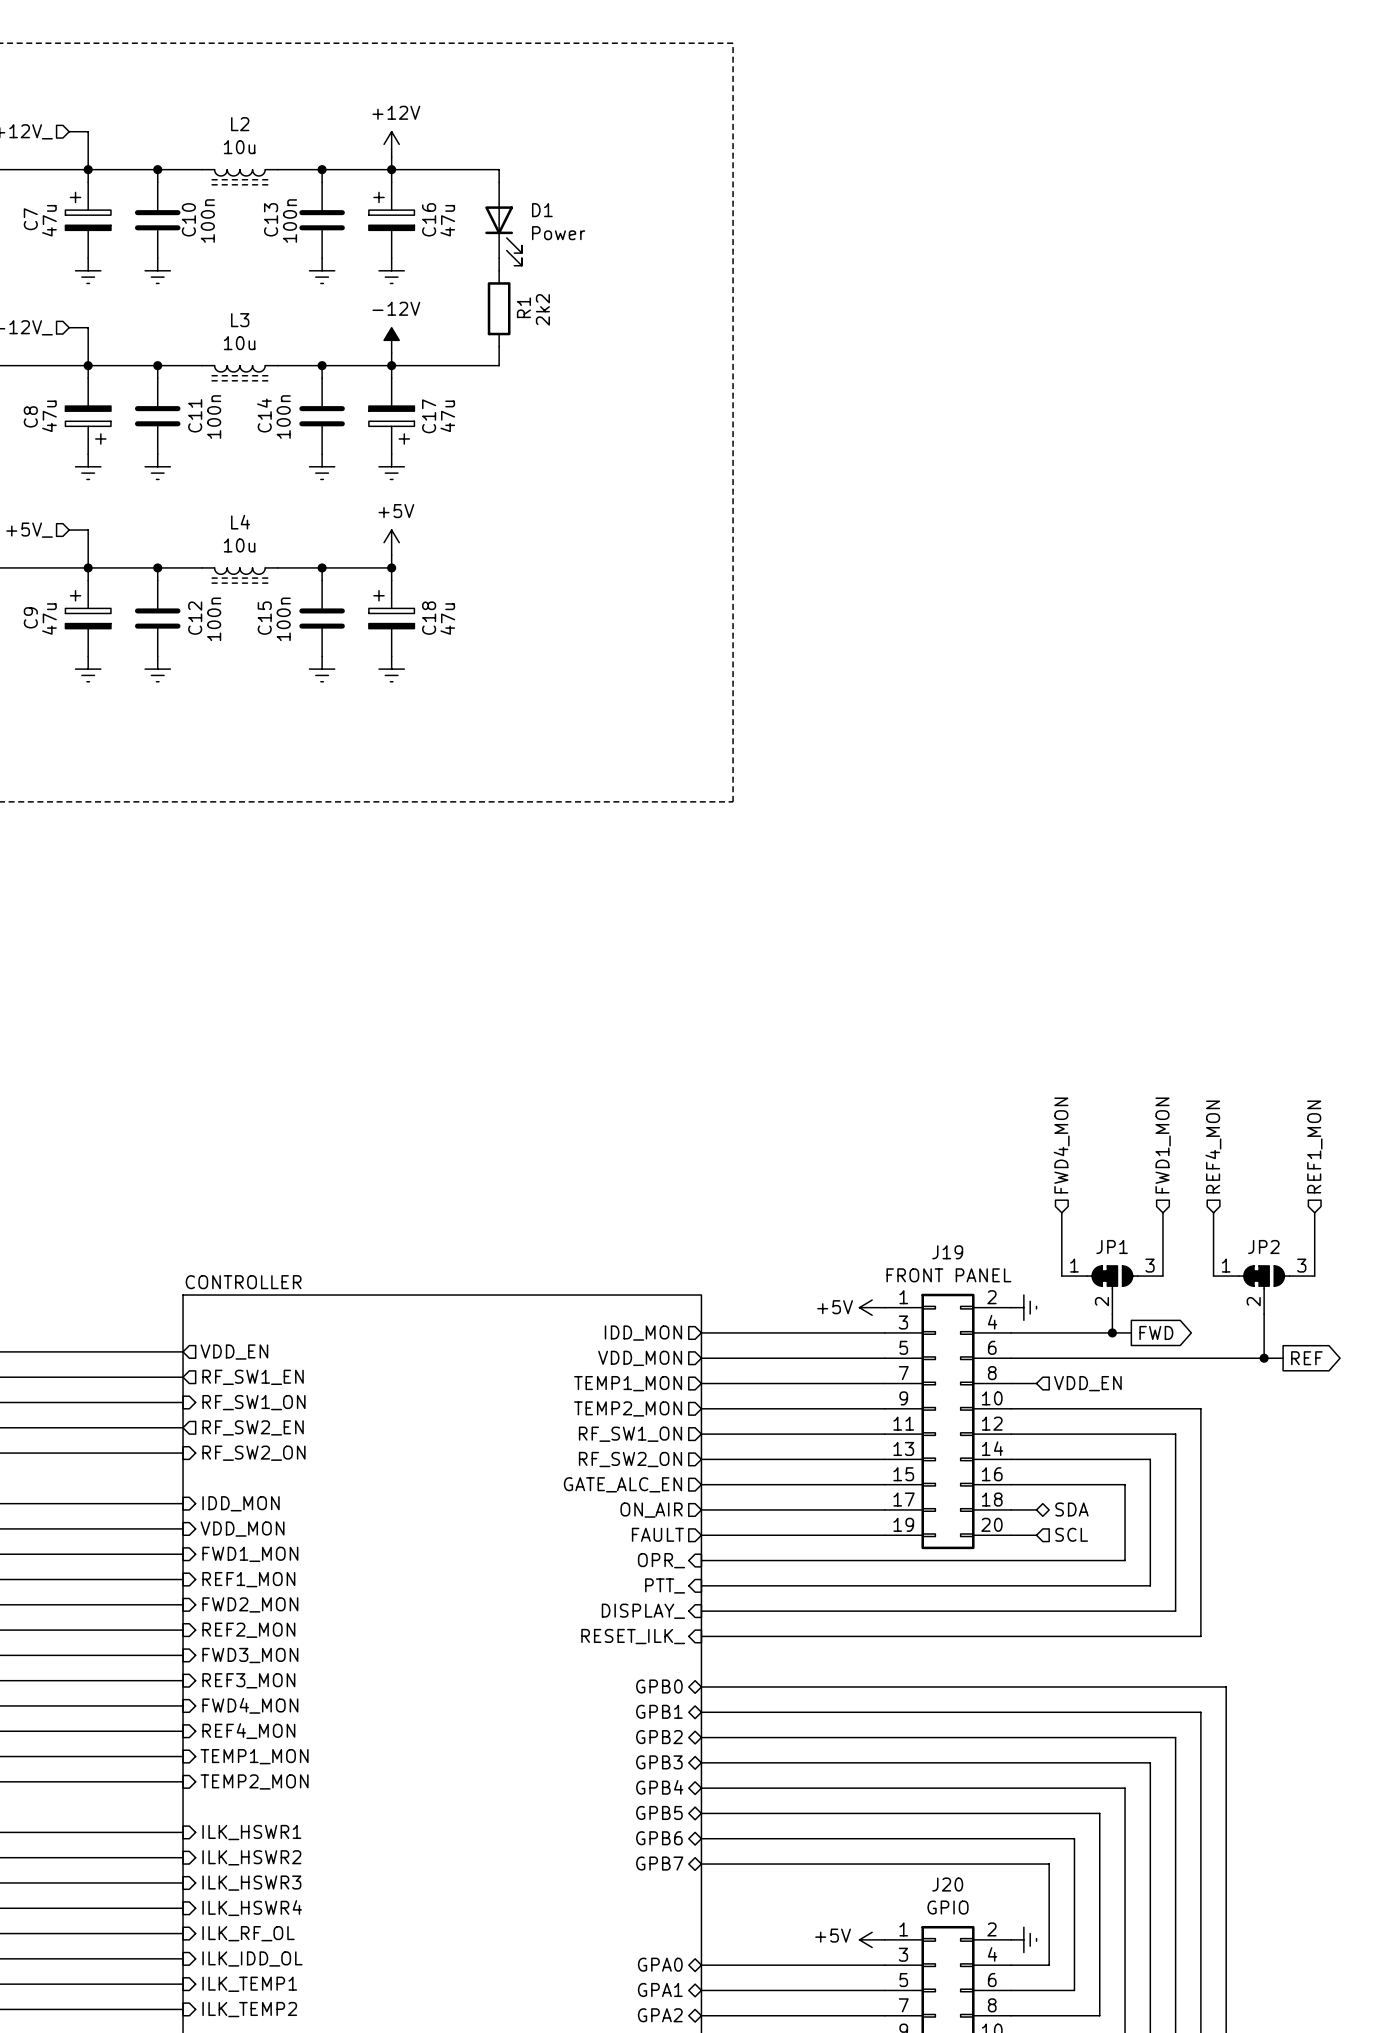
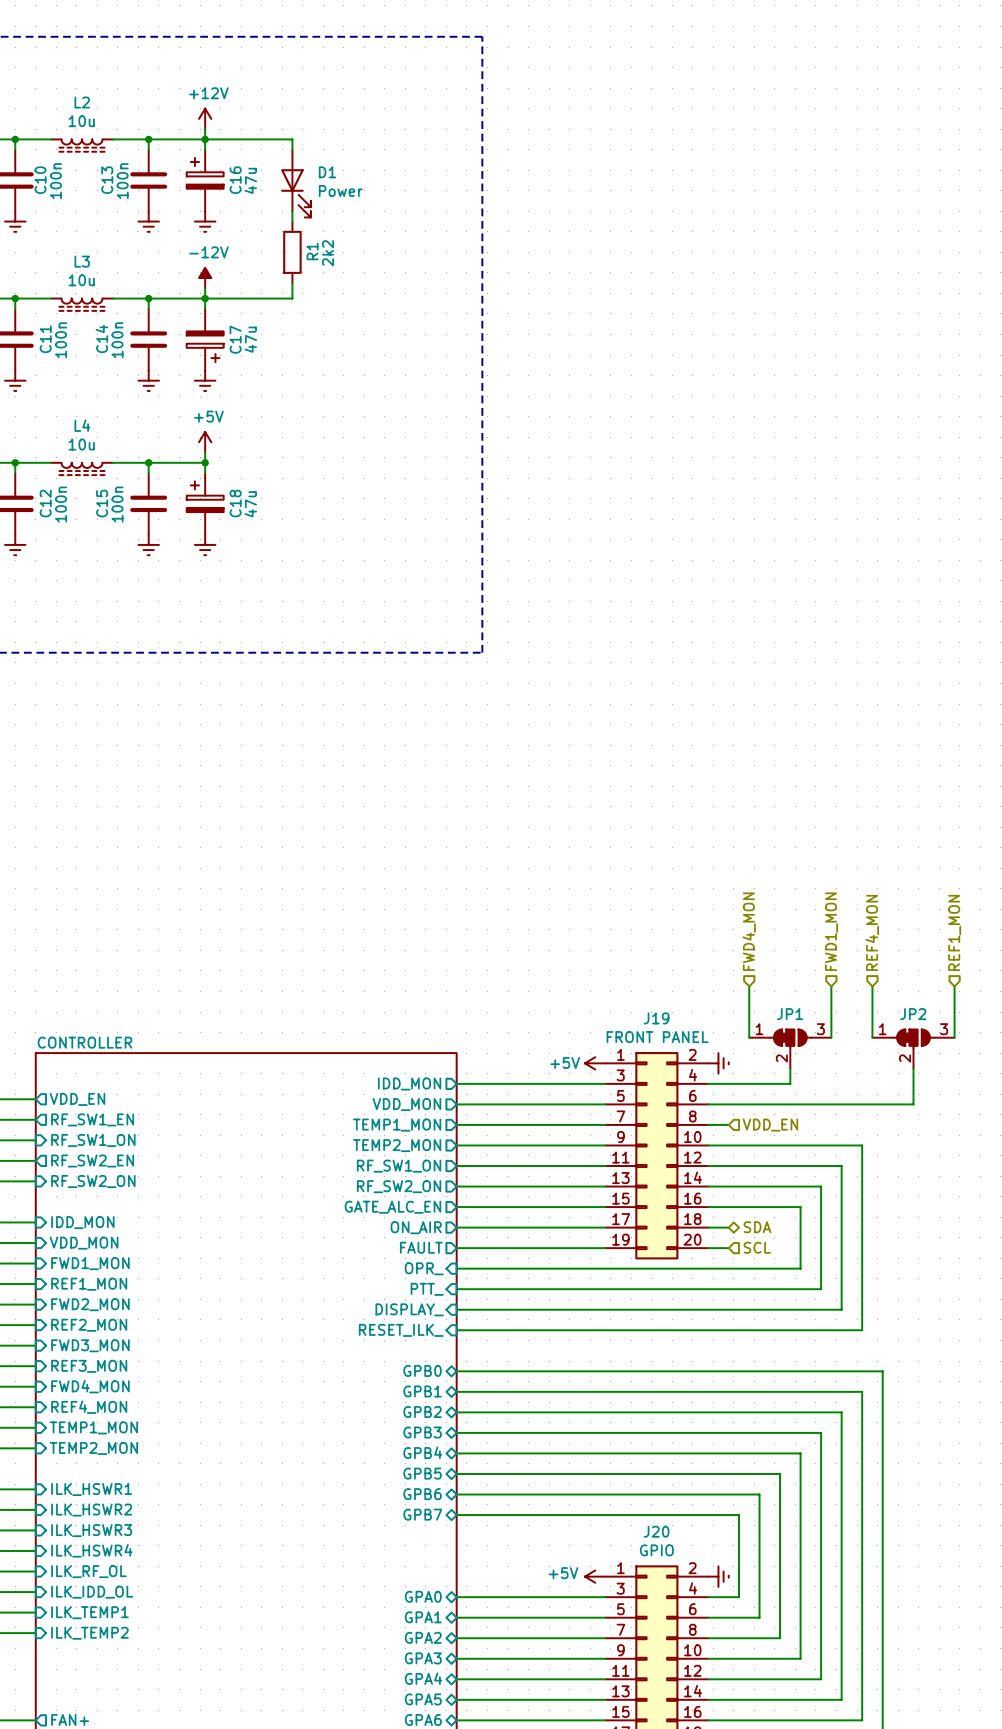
wire: (1112, 1332) (1131, 1332) -> none
junction: (1112, 1332) -> none
global label: FWD (1156, 1332) -> none
wire: (1264, 1358) (1283, 1358) -> none
junction: (1264, 1358) -> none
global label: REF (1306, 1358) -> none

